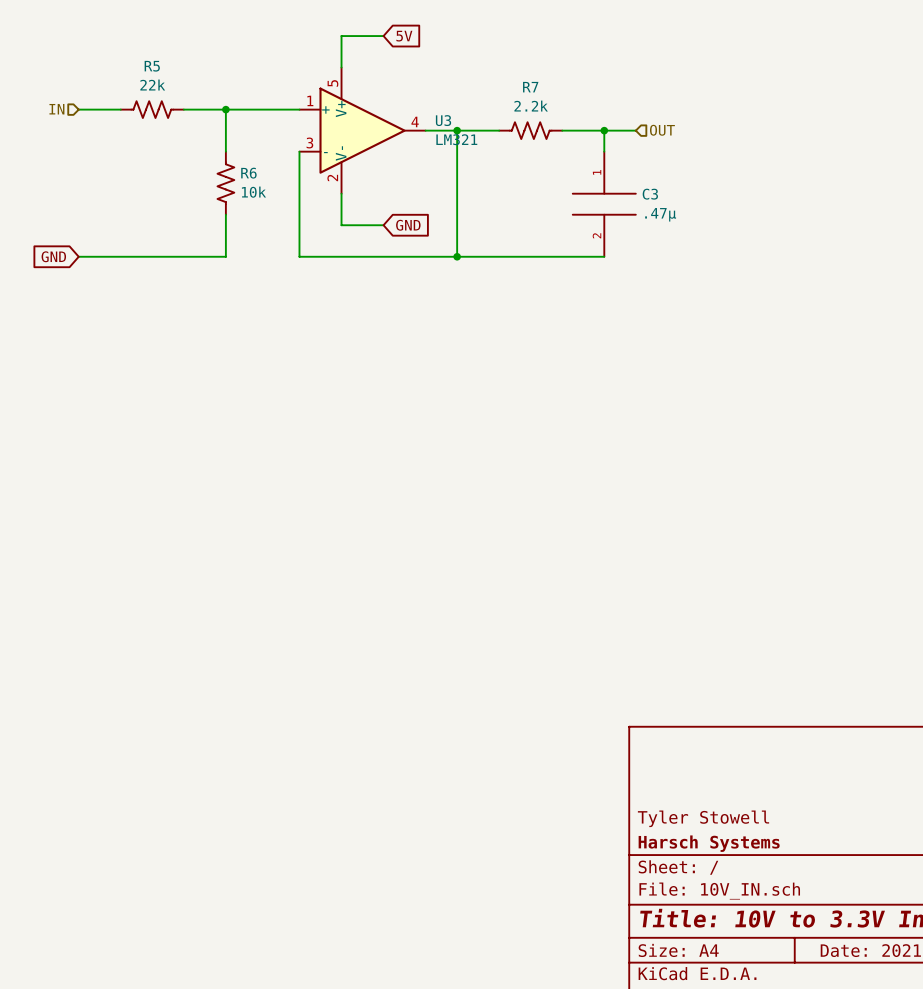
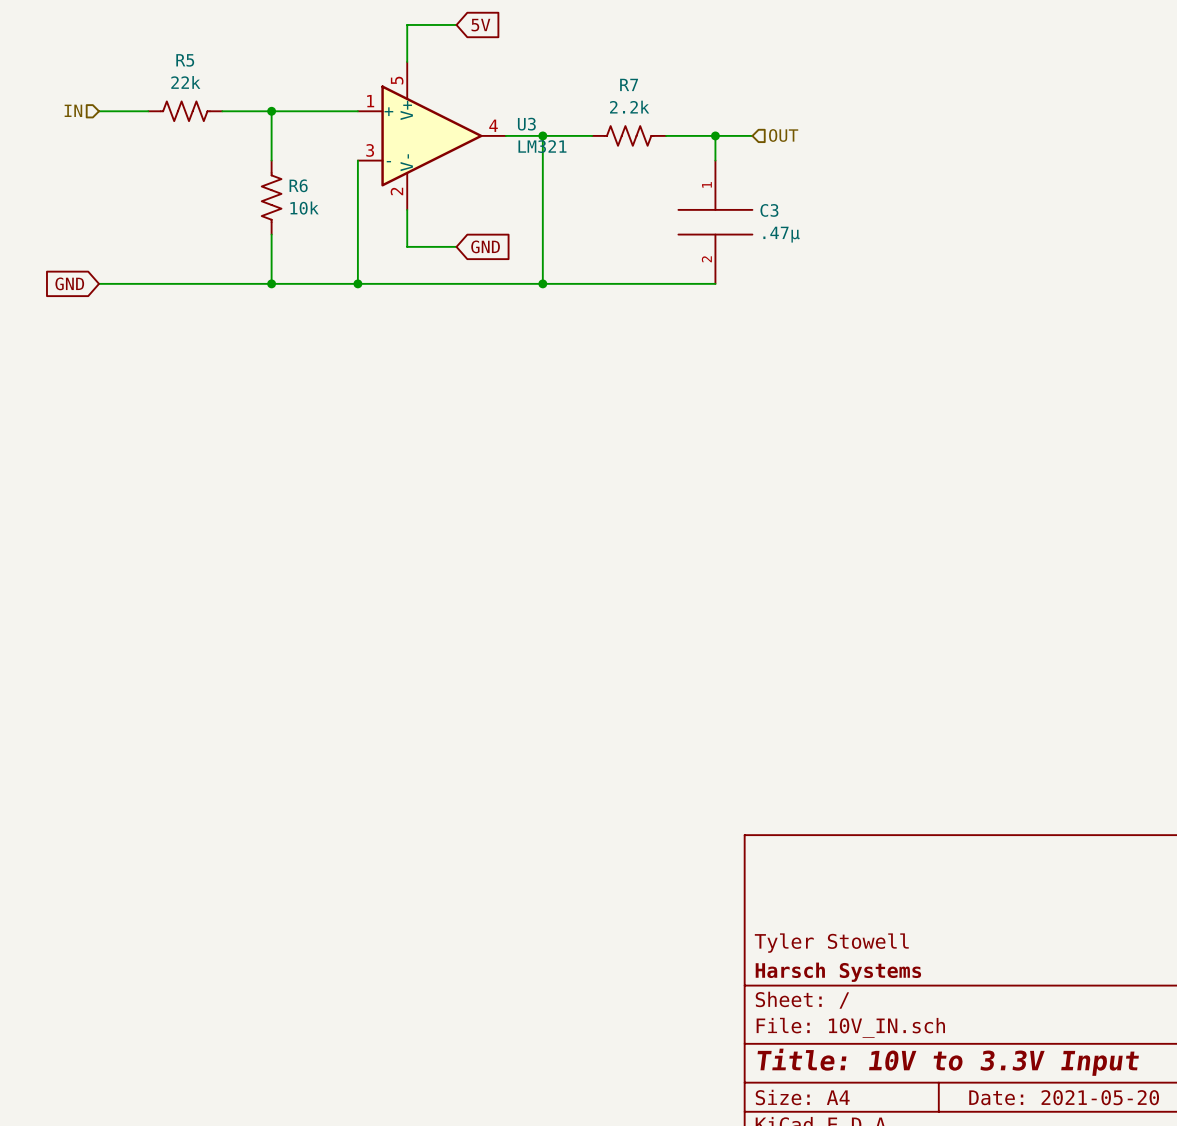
wire: none -> (271, 283) (357, 283)
junction: none -> (271, 283)
junction: none -> (357, 283)

